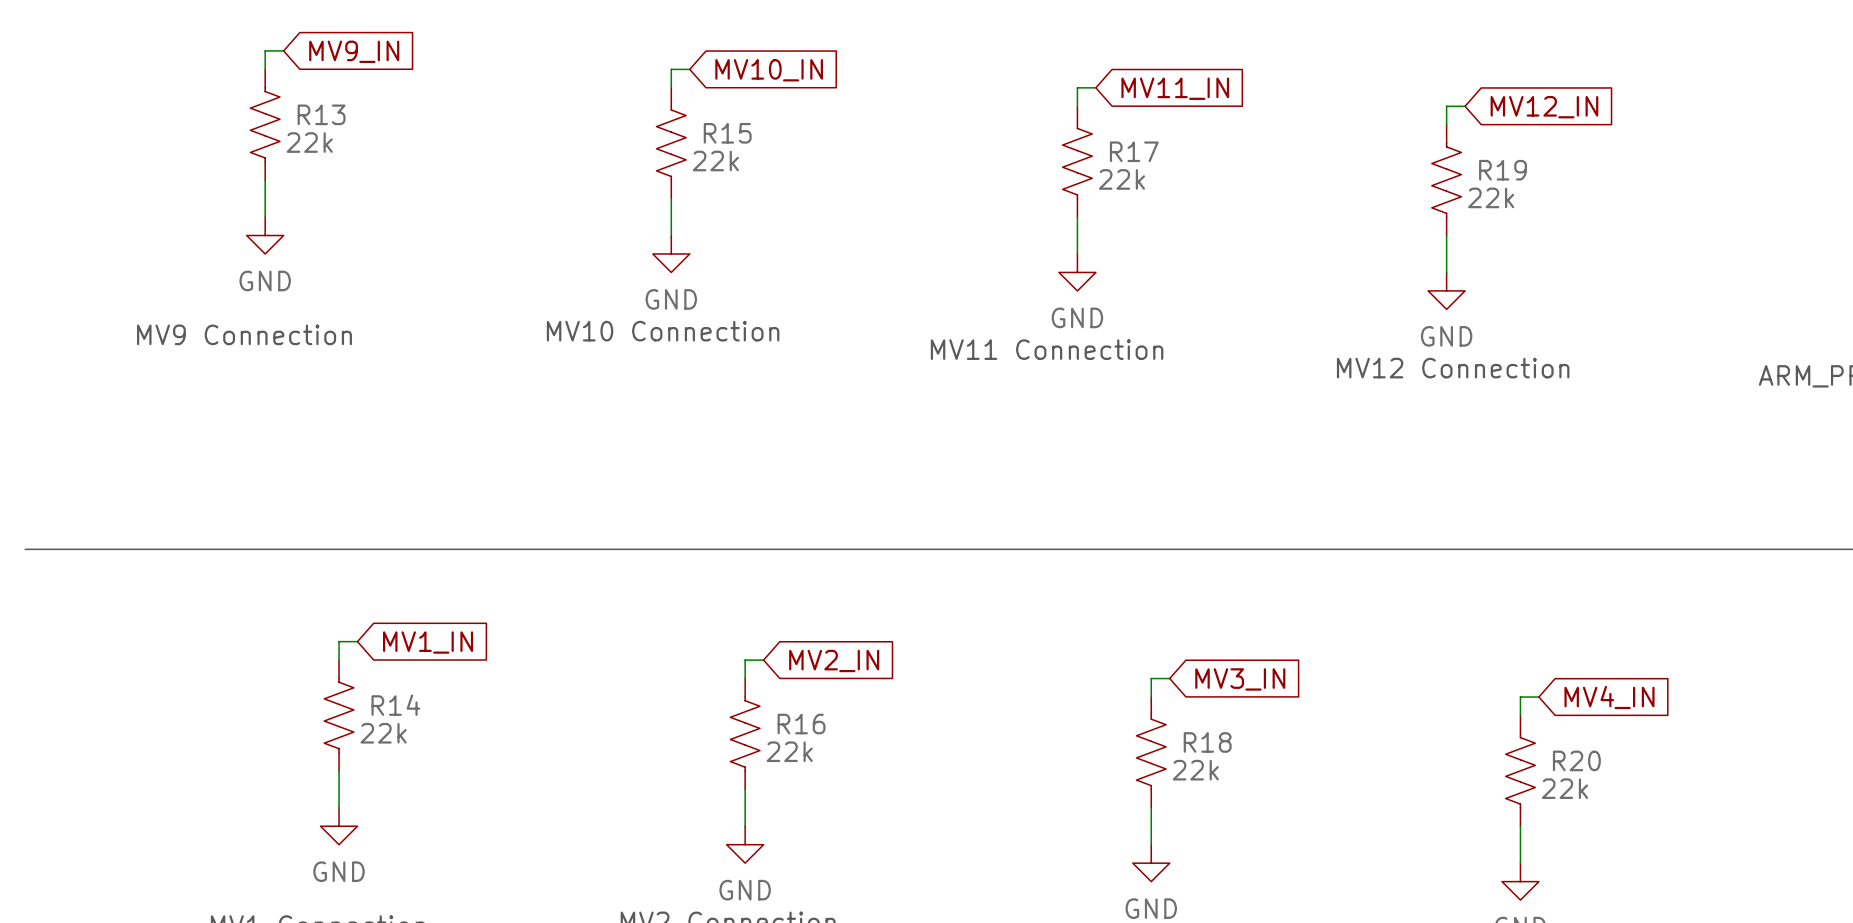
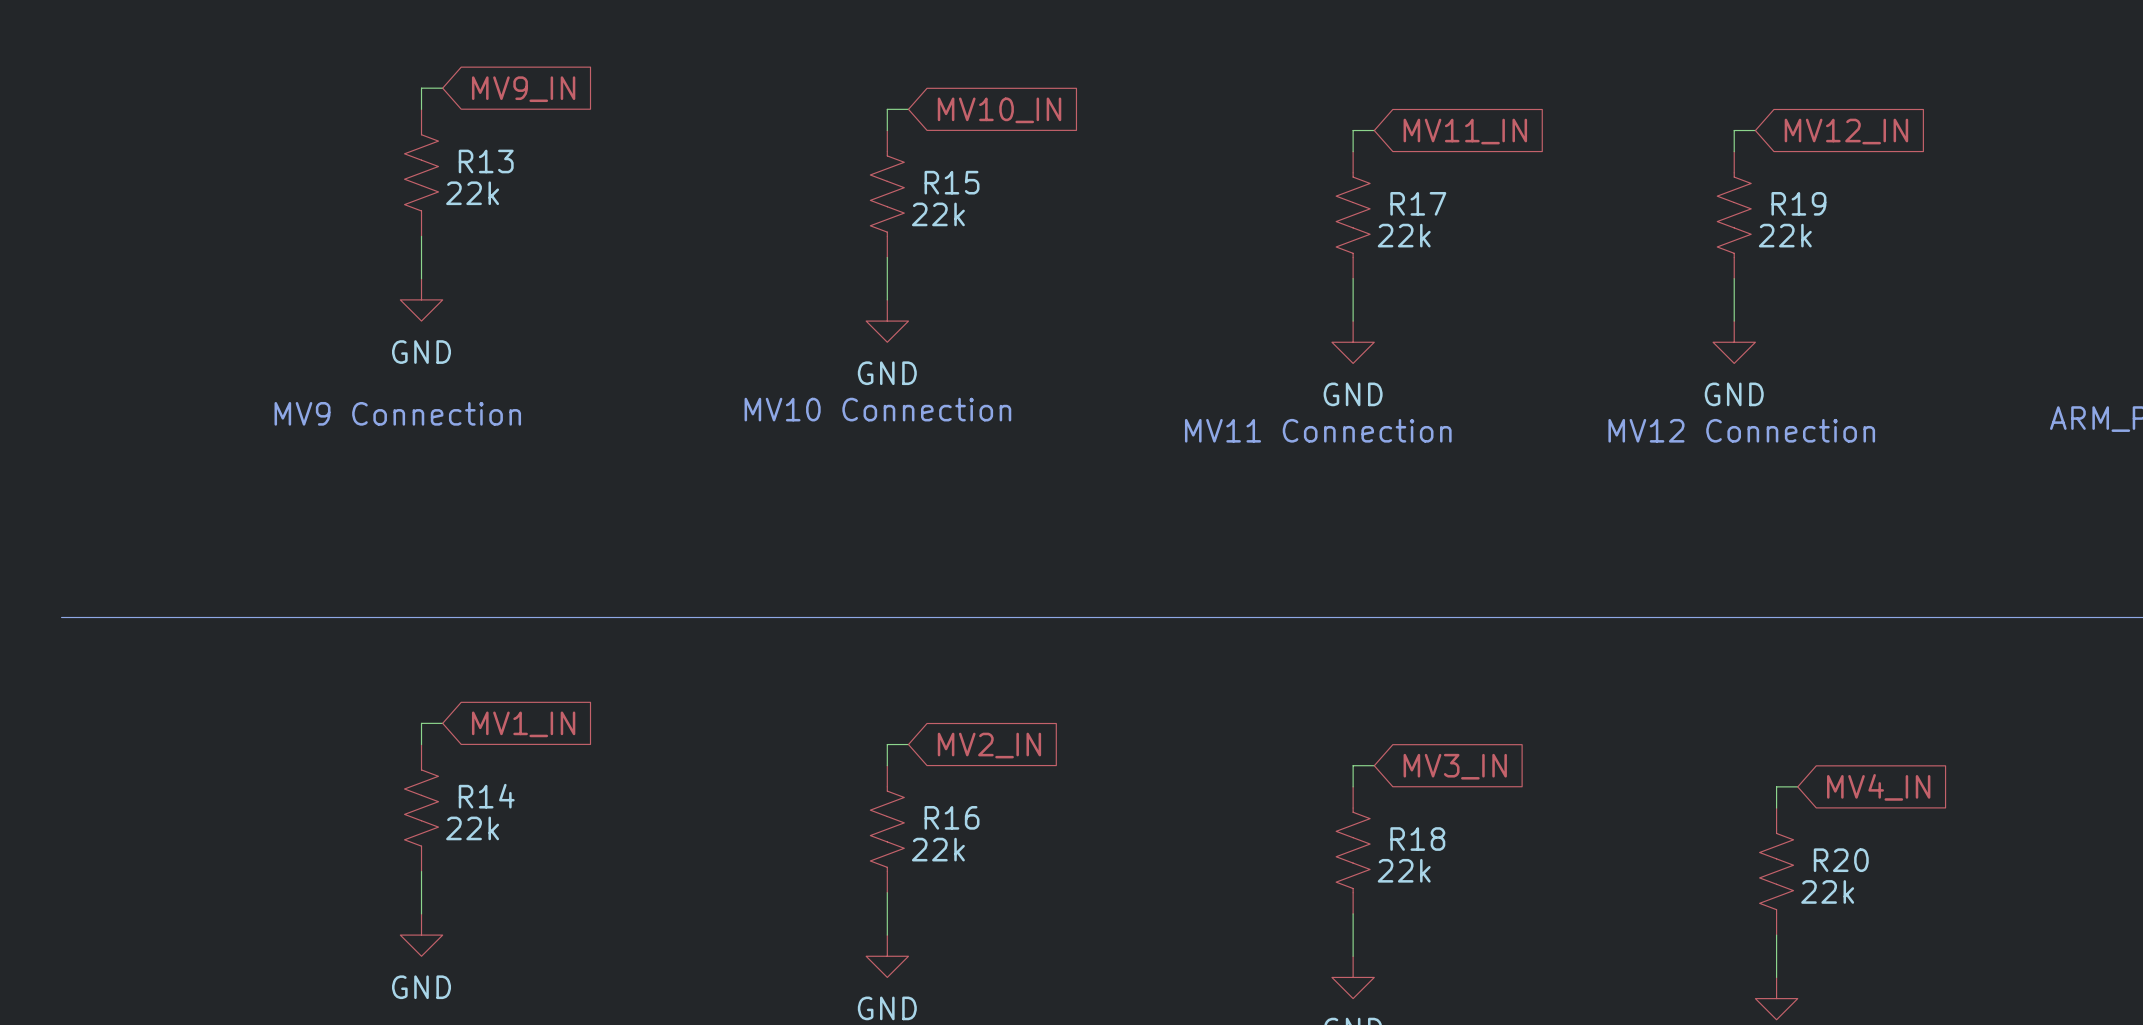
wire: (283, 50) (265, 50) (265, 69) -> (442, 88) (421, 88) (421, 109)
global label position: MV9_IN (354, 51) -> MV9_IN (523, 89)
wire: (689, 69) (671, 69) (671, 87) -> (908, 109) (887, 109) (887, 130)
global label position: MV10_IN (769, 70) -> MV10_IN (999, 110)
wire: (1095, 87) (1077, 87) (1077, 106) -> (1374, 130) (1353, 130) (1353, 151)
global label position: MV11_IN (1175, 88) -> MV11_IN (1465, 131)
wire: (1465, 106) (1446, 106) (1446, 124) -> (1755, 130) (1734, 130) (1734, 151)
global label position: MV12_IN (1544, 107) -> MV12_IN (1846, 131)
R13 position: (265, 124) -> (421, 172)
R15 position: (671, 143) -> (887, 194)
R17 position: (1077, 161) -> (1353, 215)
wire: (265, 180) (265, 217) -> (421, 236) (421, 278)
R19 position: (1446, 180) -> (1734, 215)
wire: (671, 198) (671, 235) -> (887, 257) (887, 299)
wire: (1077, 217) (1077, 253) -> (1353, 278) (1353, 321)
power symbol position: GND (265, 235) -> GND (421, 299)
wire: (1446, 235) (1446, 272) -> (1734, 278) (1734, 321)
power symbol position: GND (671, 253) -> GND (887, 321)
power symbol position: GND (1077, 272) -> GND (1353, 342)
power symbol position: GND (1446, 290) -> GND (1734, 342)
text position: MV10 Connection (663, 331) -> MV10 Connection (877, 409)
text position: MV9 Connection (244, 334) -> MV9 Connection (397, 413)
text position: MV11 Connection (1047, 349) -> MV11 Connection (1318, 430)
text position: MV12 Connection (1453, 368) -> MV12 Connection (1741, 430)

